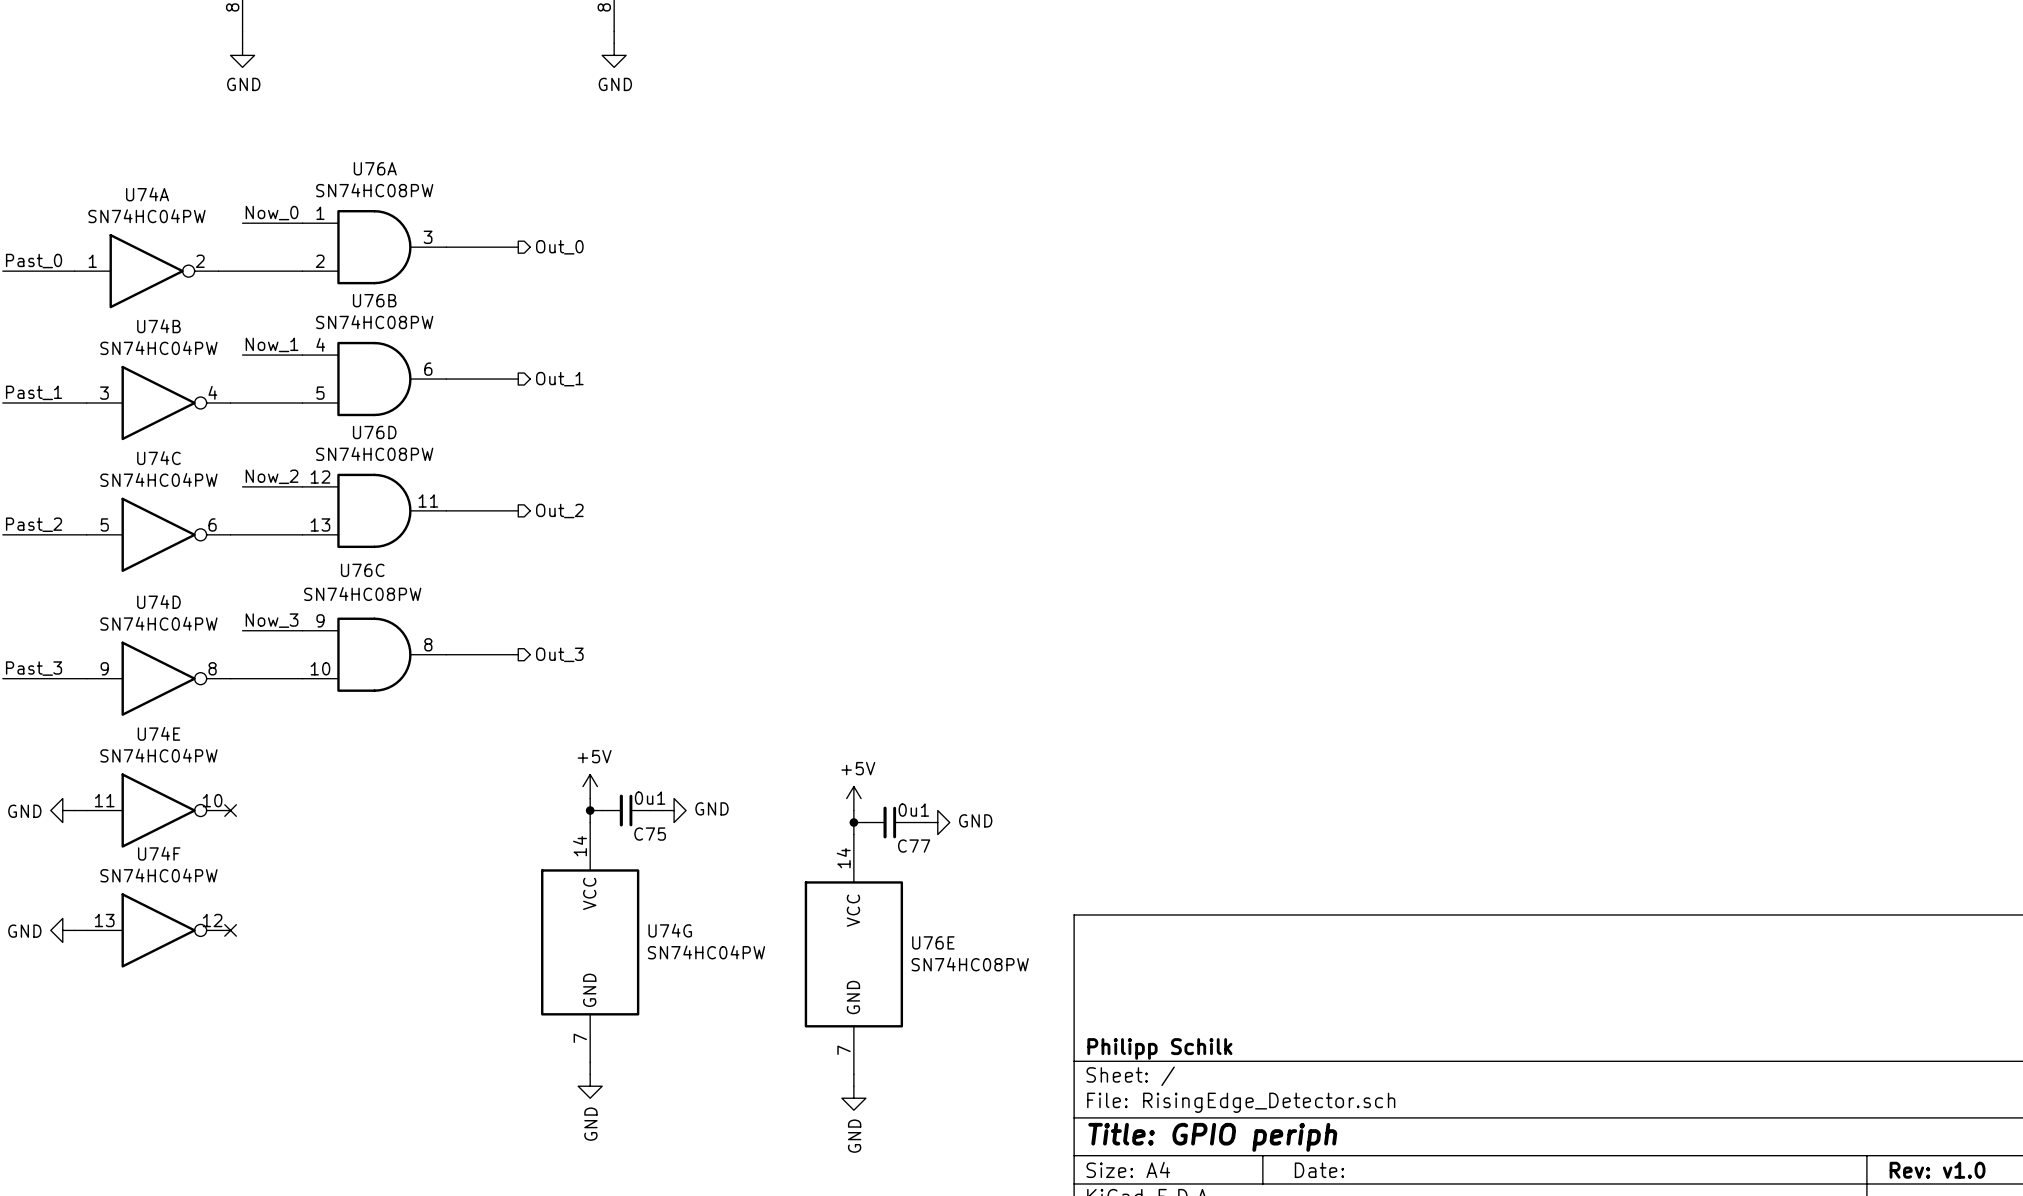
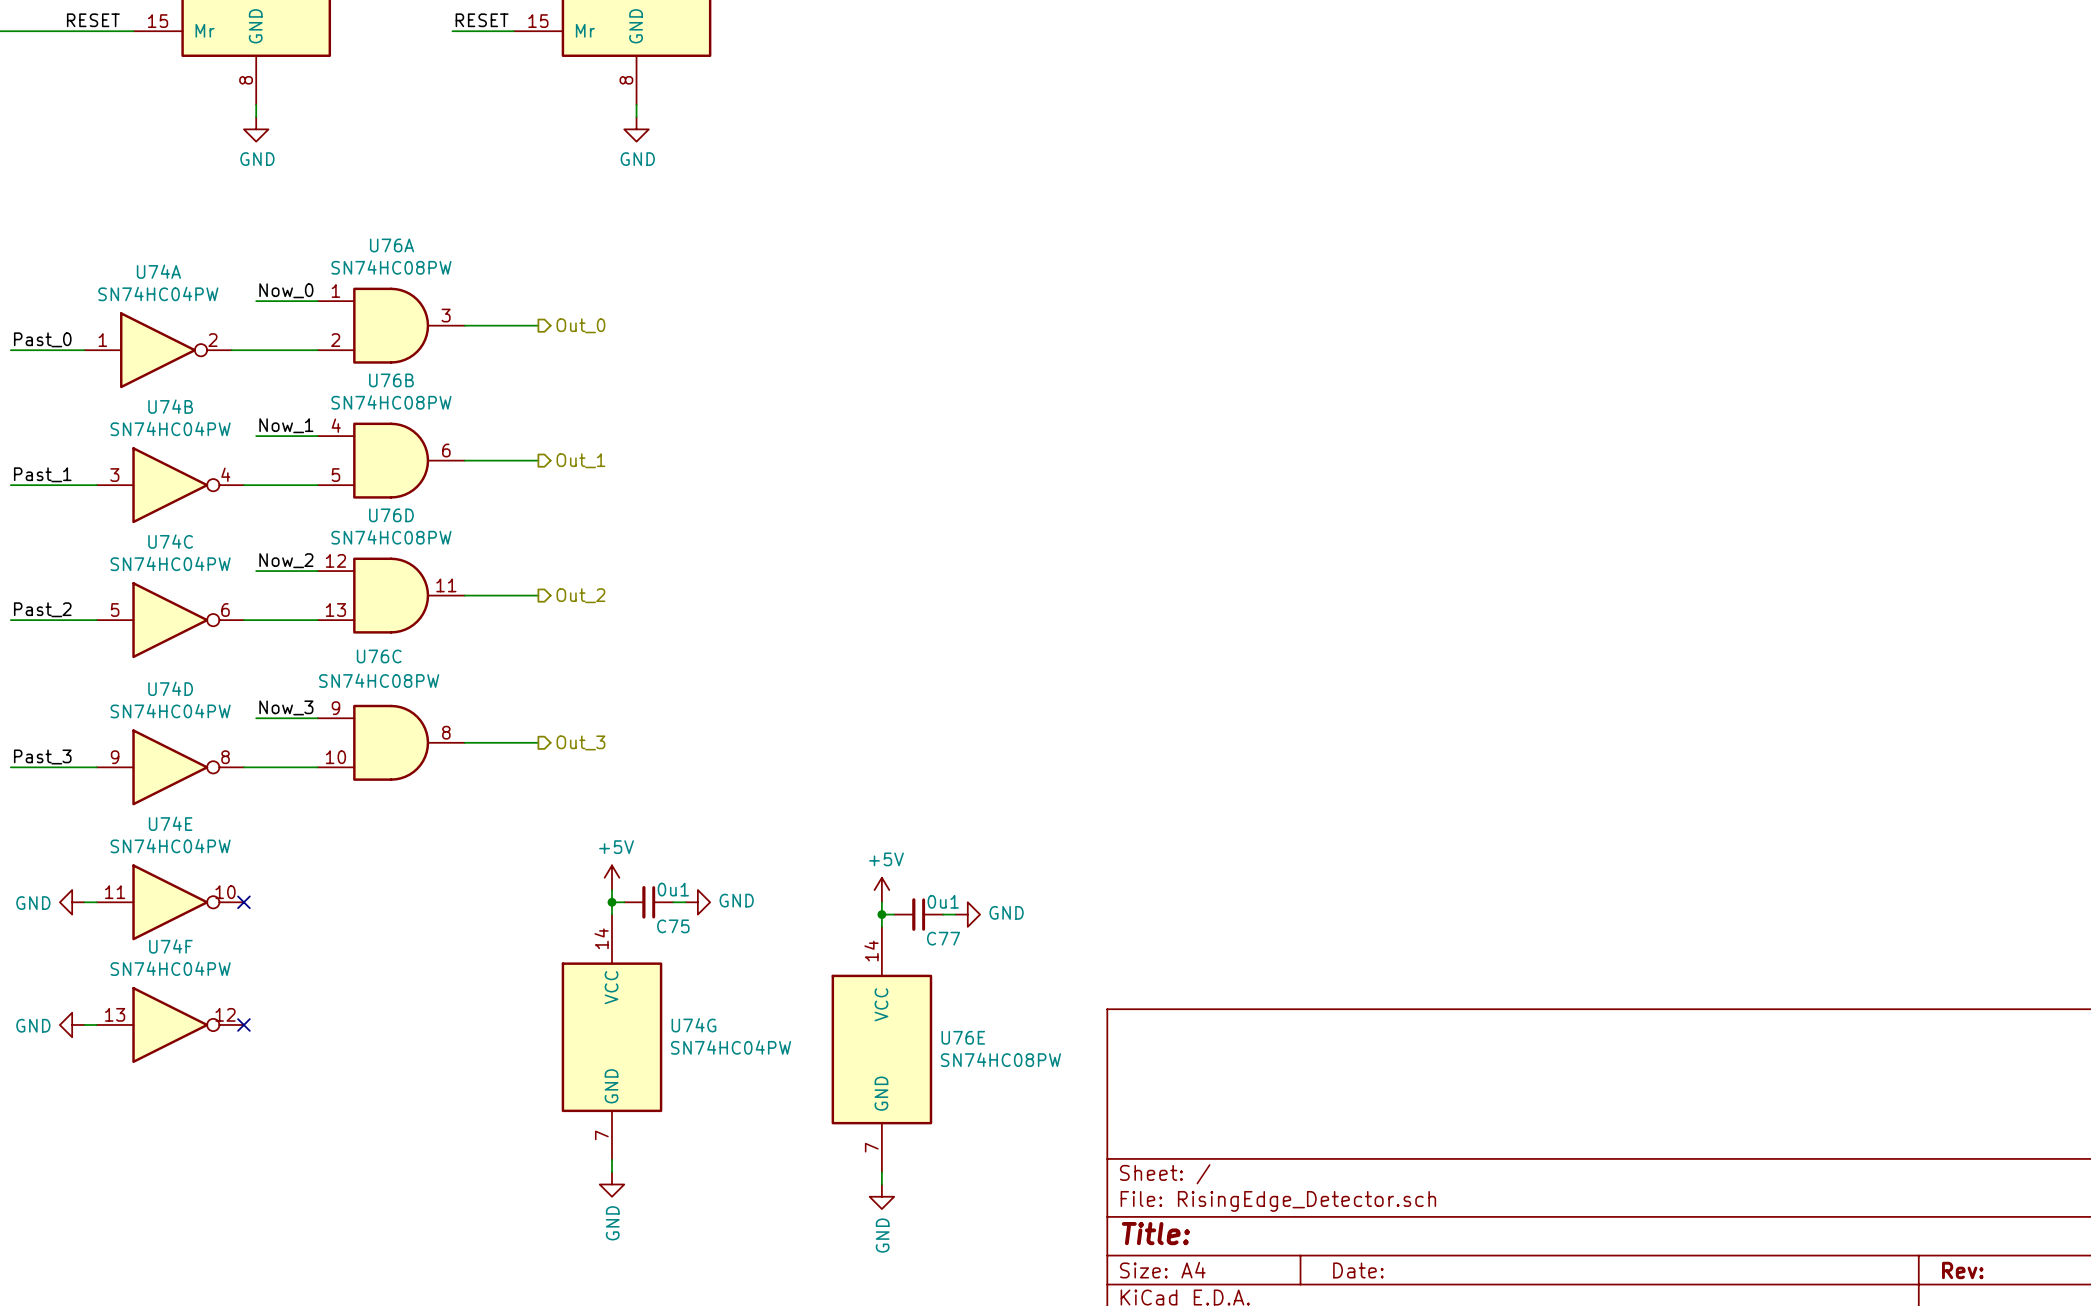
title block: Philipp Schilk (1159, 1048) -> none
title block: Title: GPIO periph (1212, 1137) -> Title: (1155, 1233)
title block: Rev: v1.0 (1937, 1170) -> Rev: (1962, 1270)

